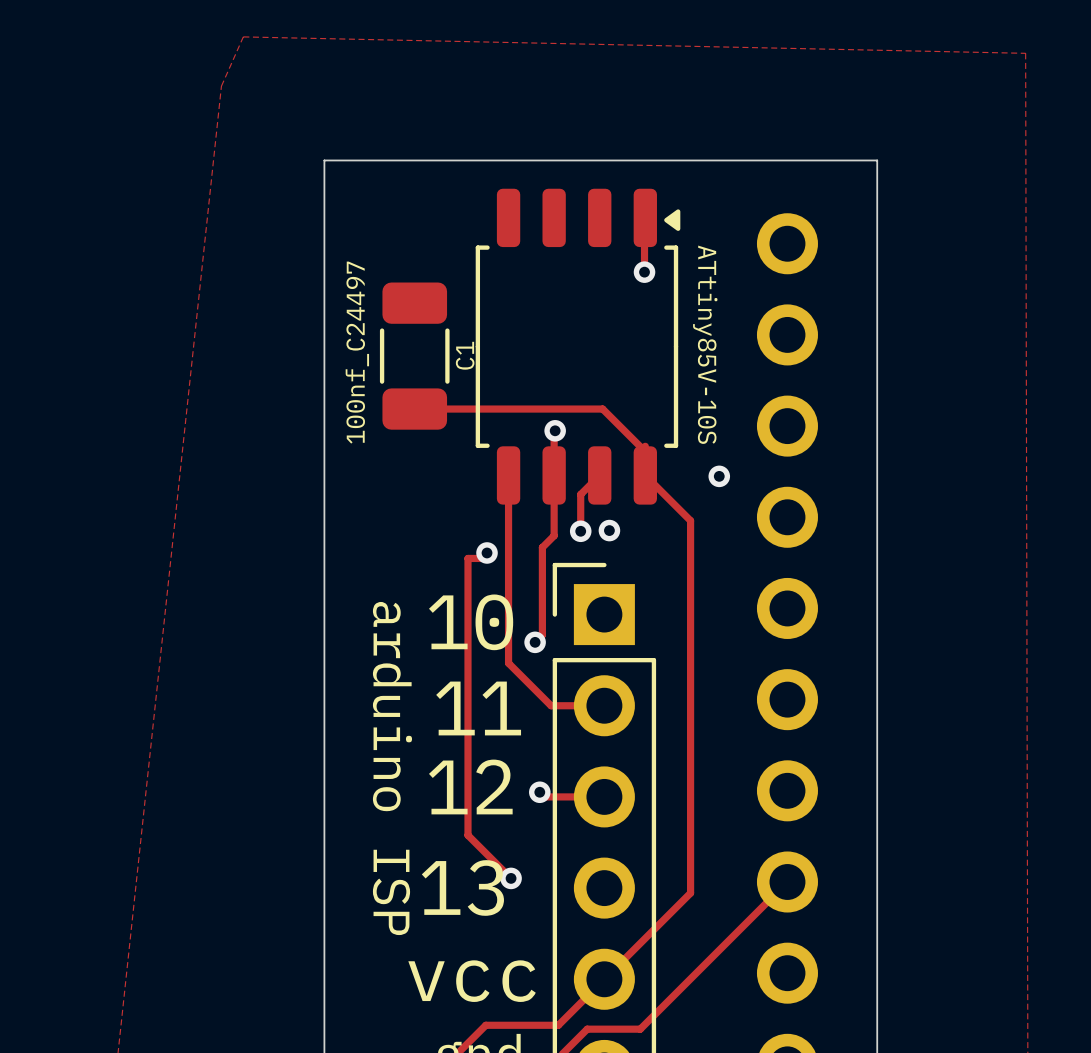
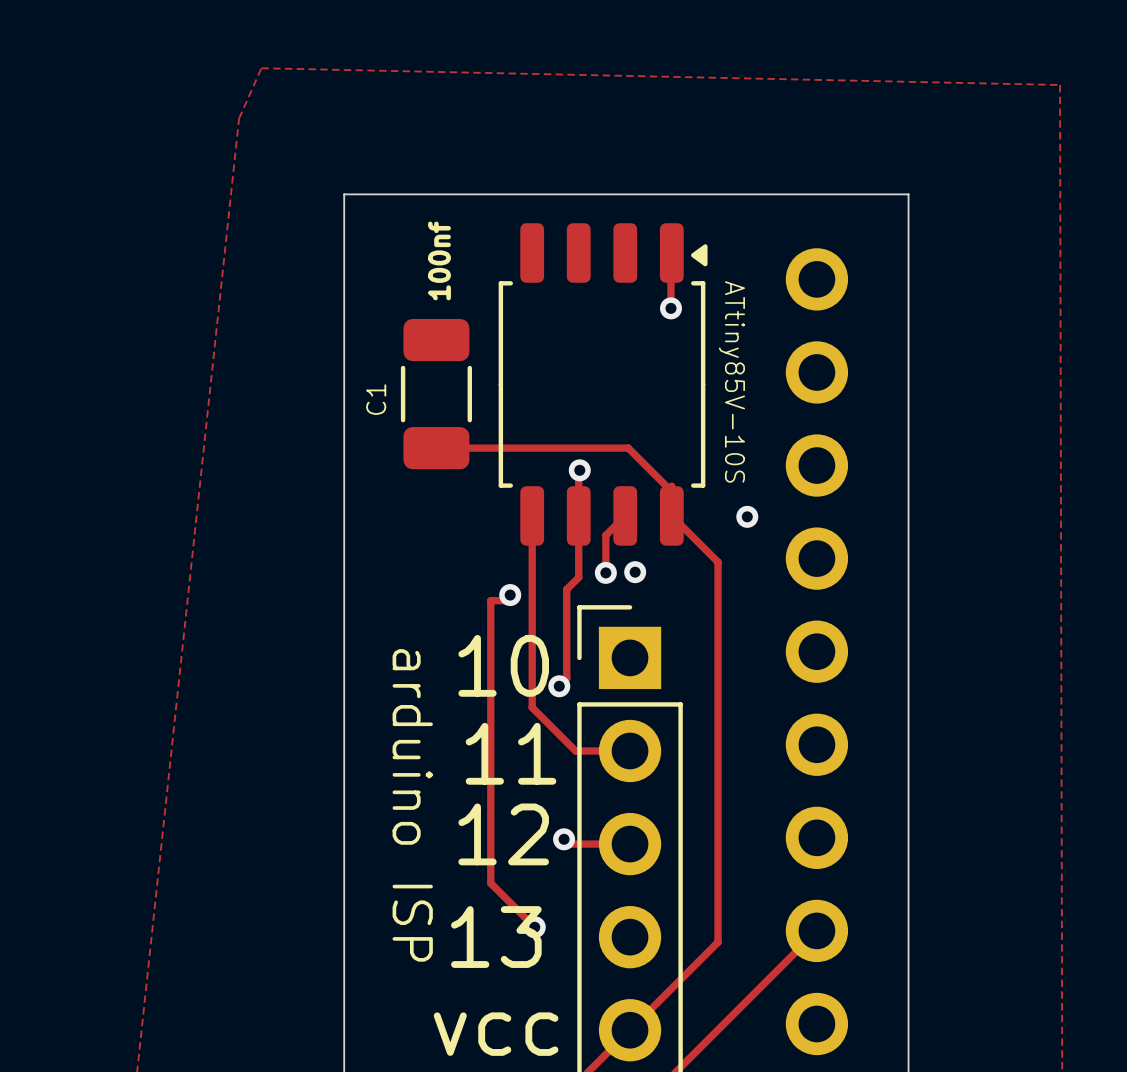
C1 value: 100nf_C24497 (357, 352) -> 100nf (439, 260)
C1 name position: C1 (465, 355) -> C1 (376, 399)

